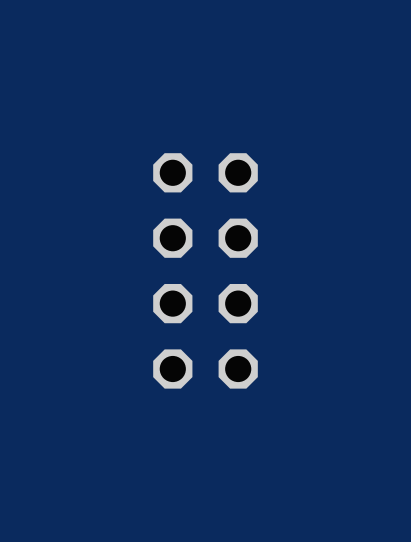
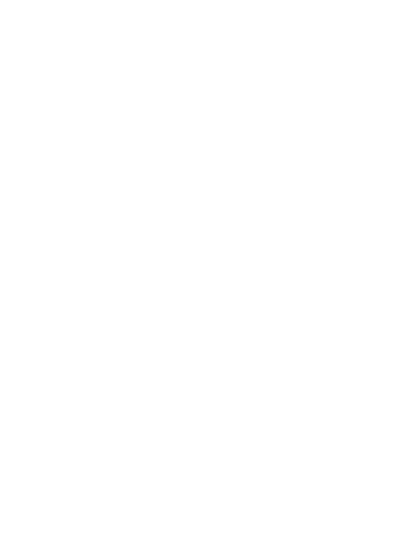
part: (205, 270) -> none

